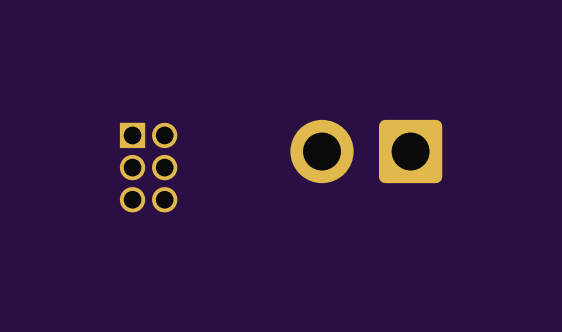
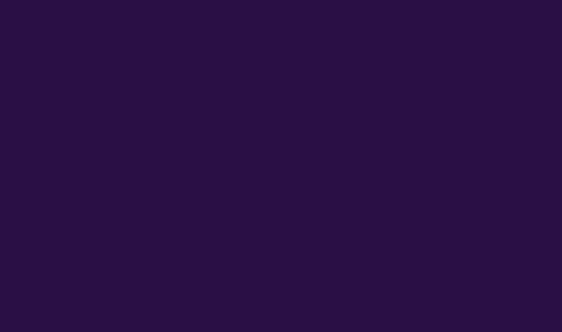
part: (366, 151) -> none
part: (148, 167) -> none

